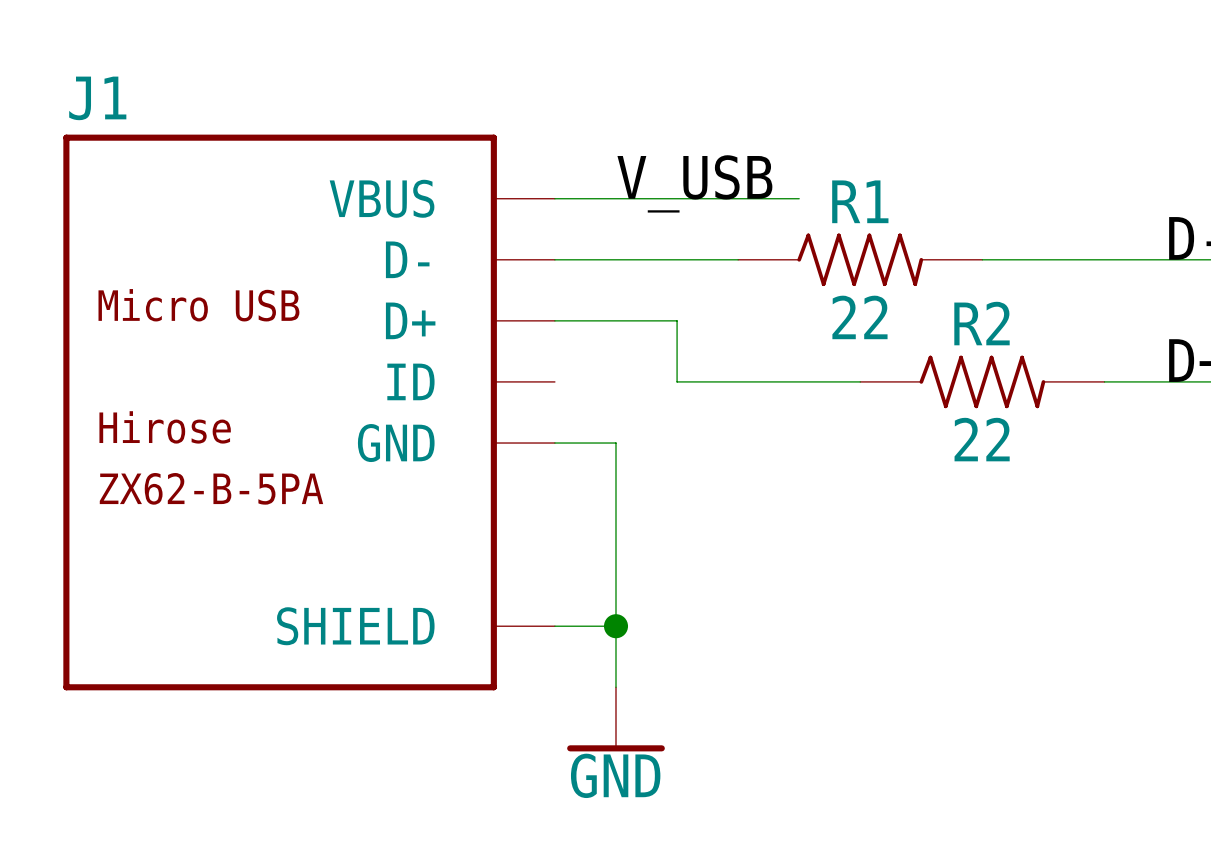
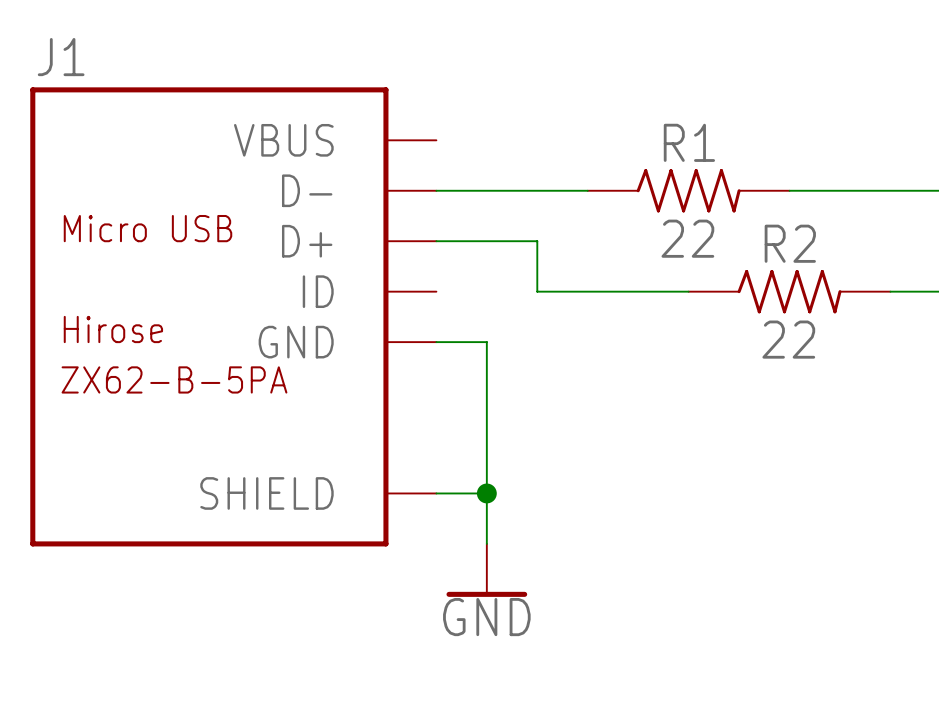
label: V_USB (694, 183) -> none
wire: (554, 198) (799, 198) -> none

